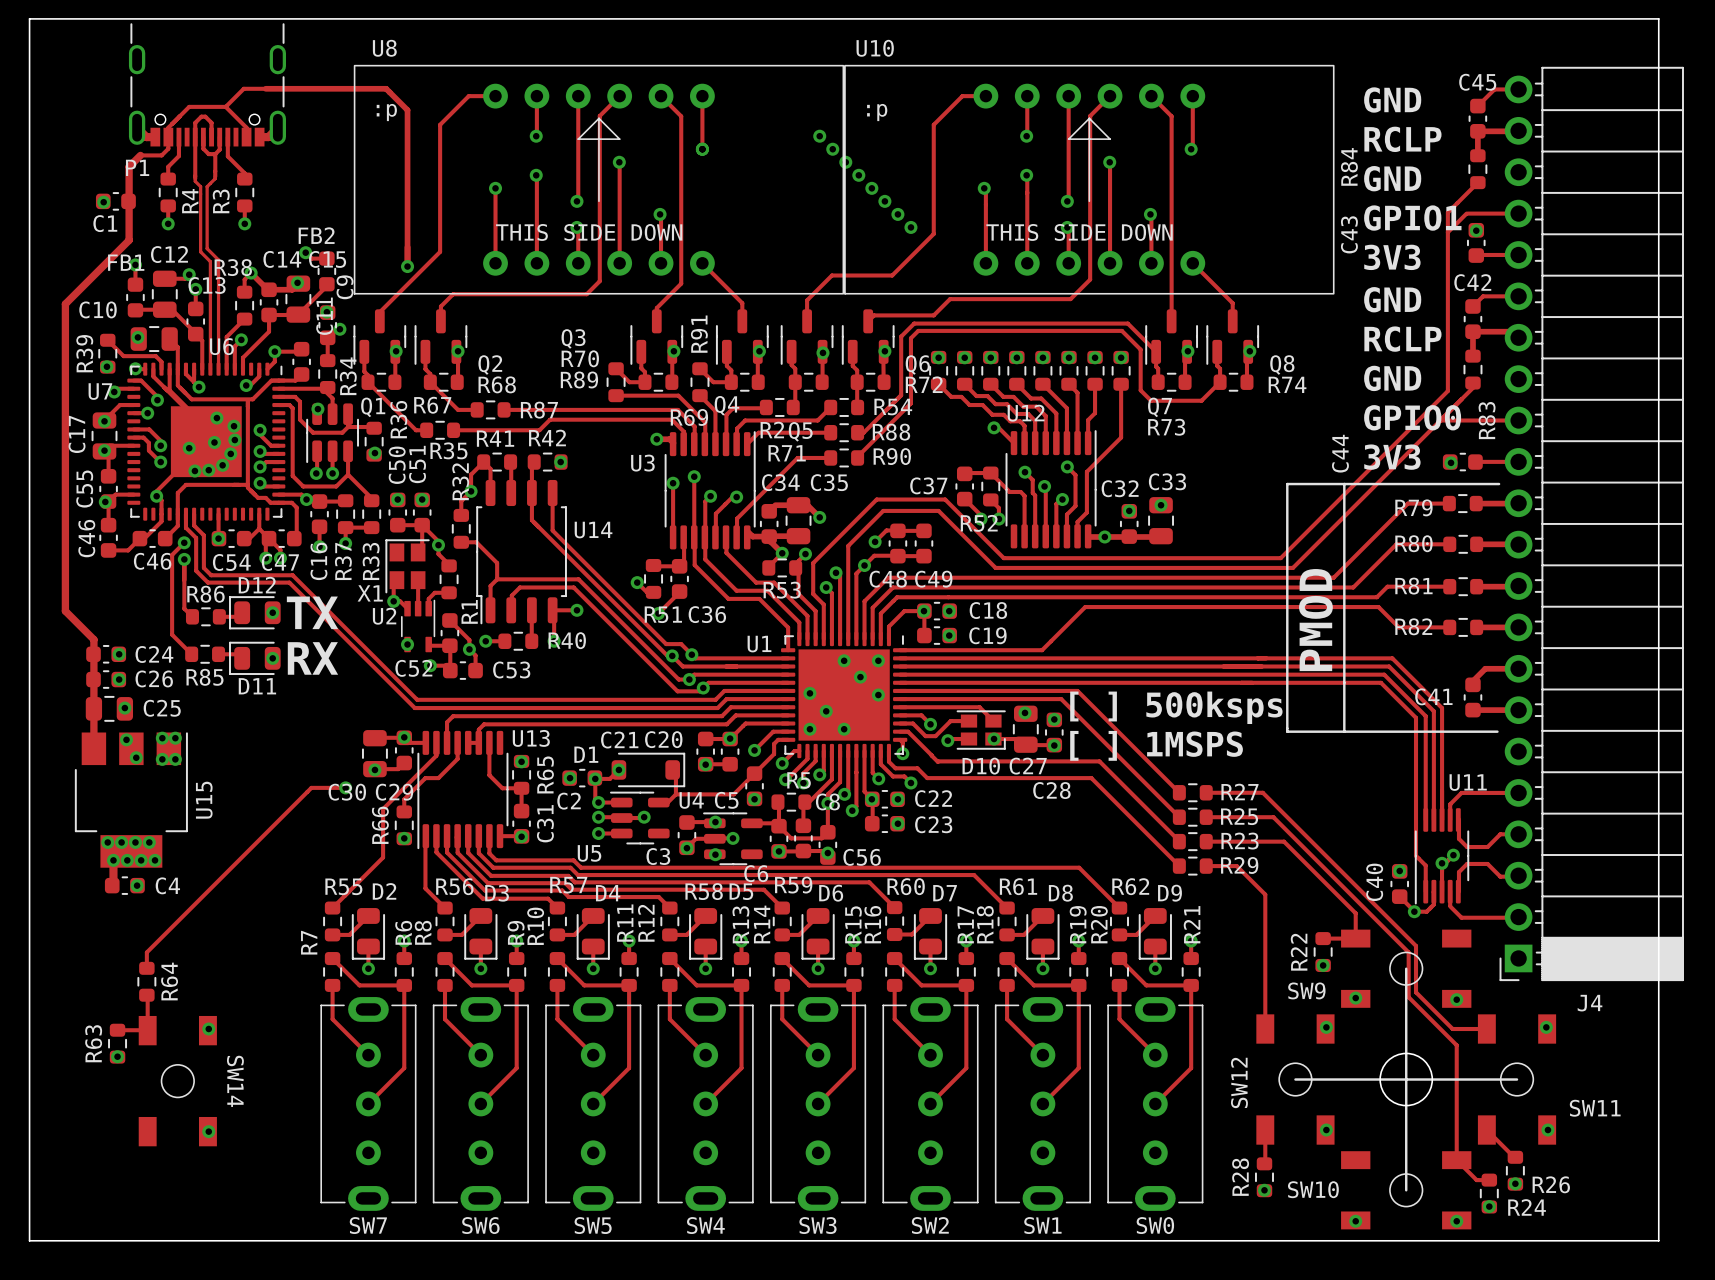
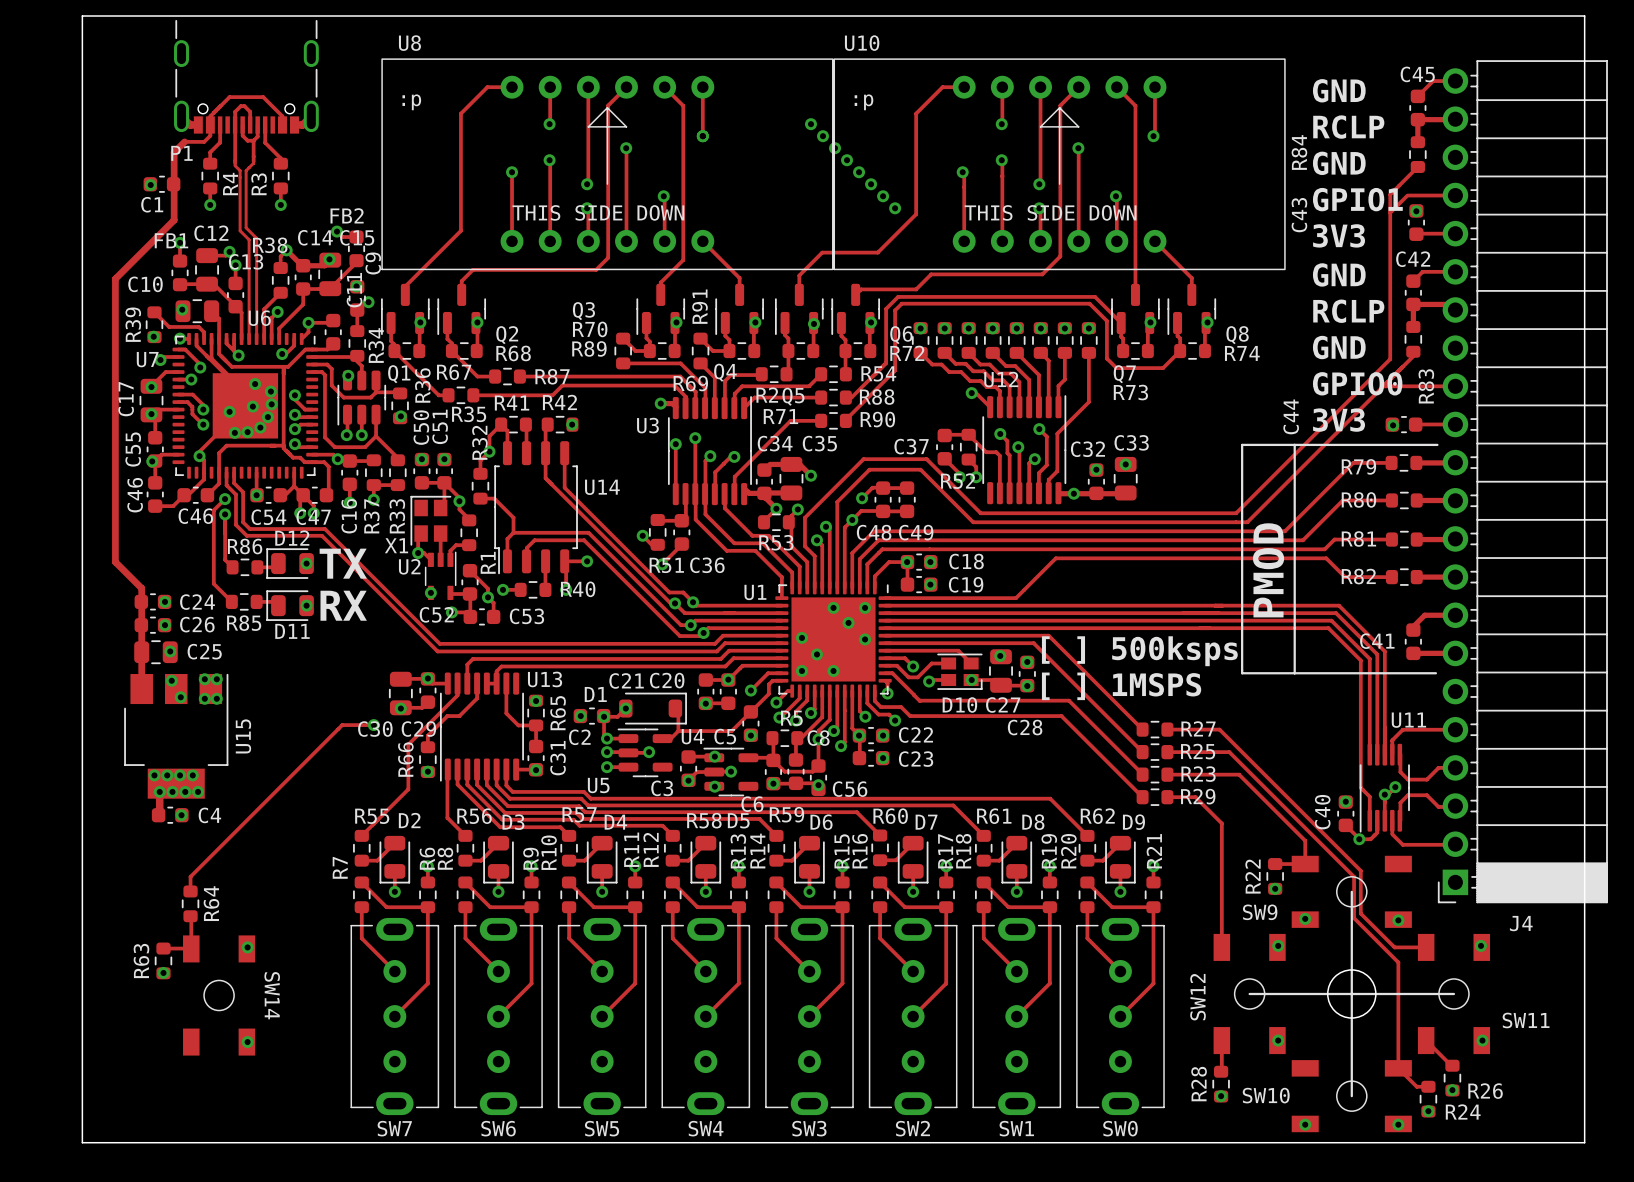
track: (225, 106) (243, 88) (386, 88) (407, 110) (407, 266) -> none
via: (407, 266) -> none

